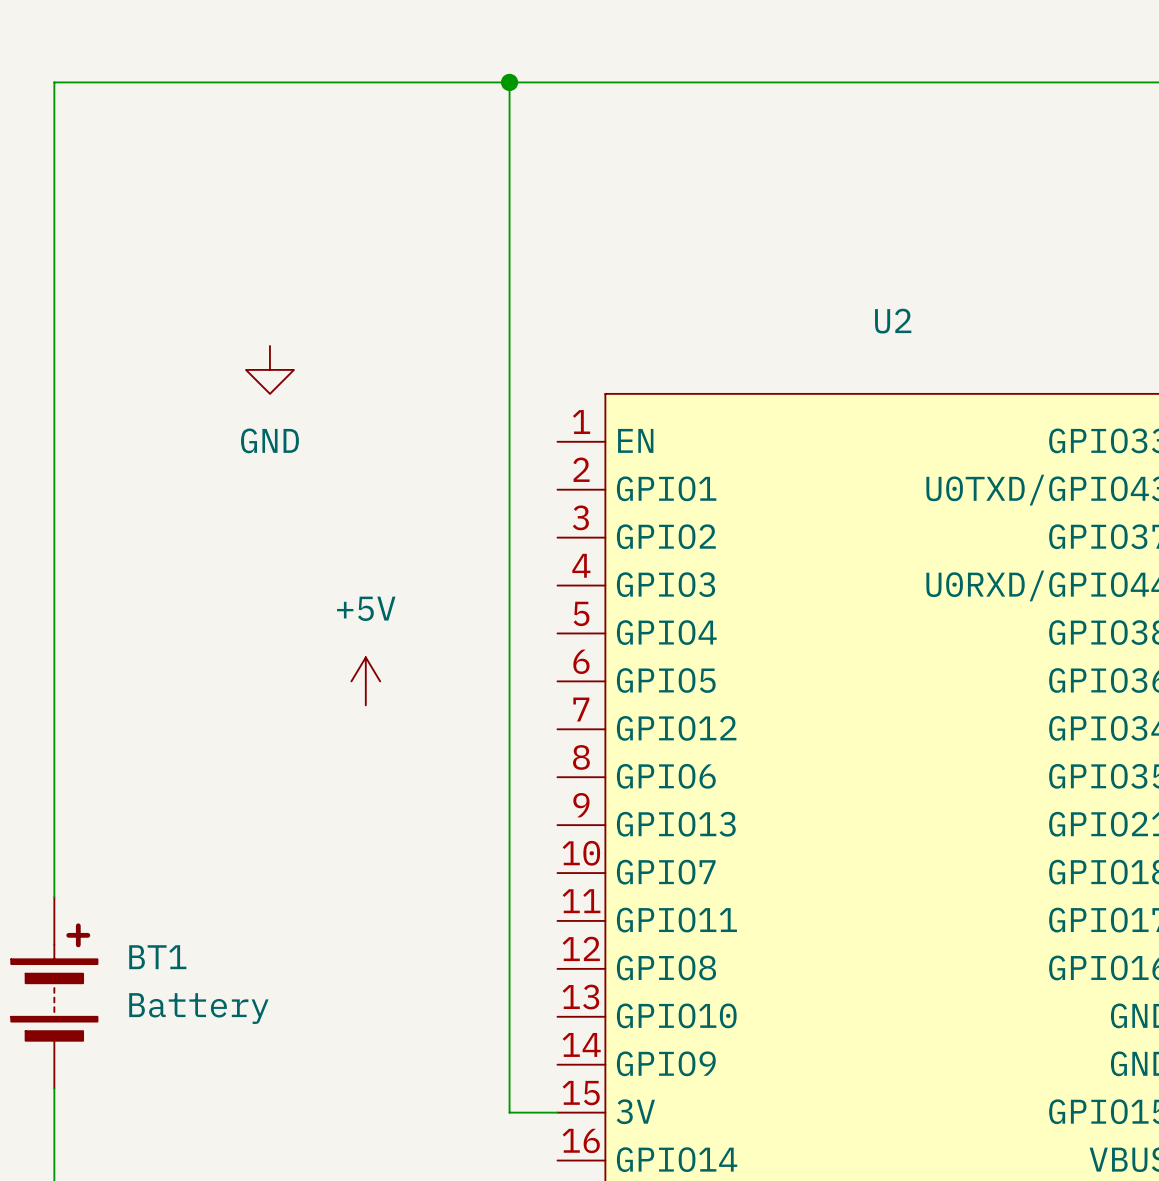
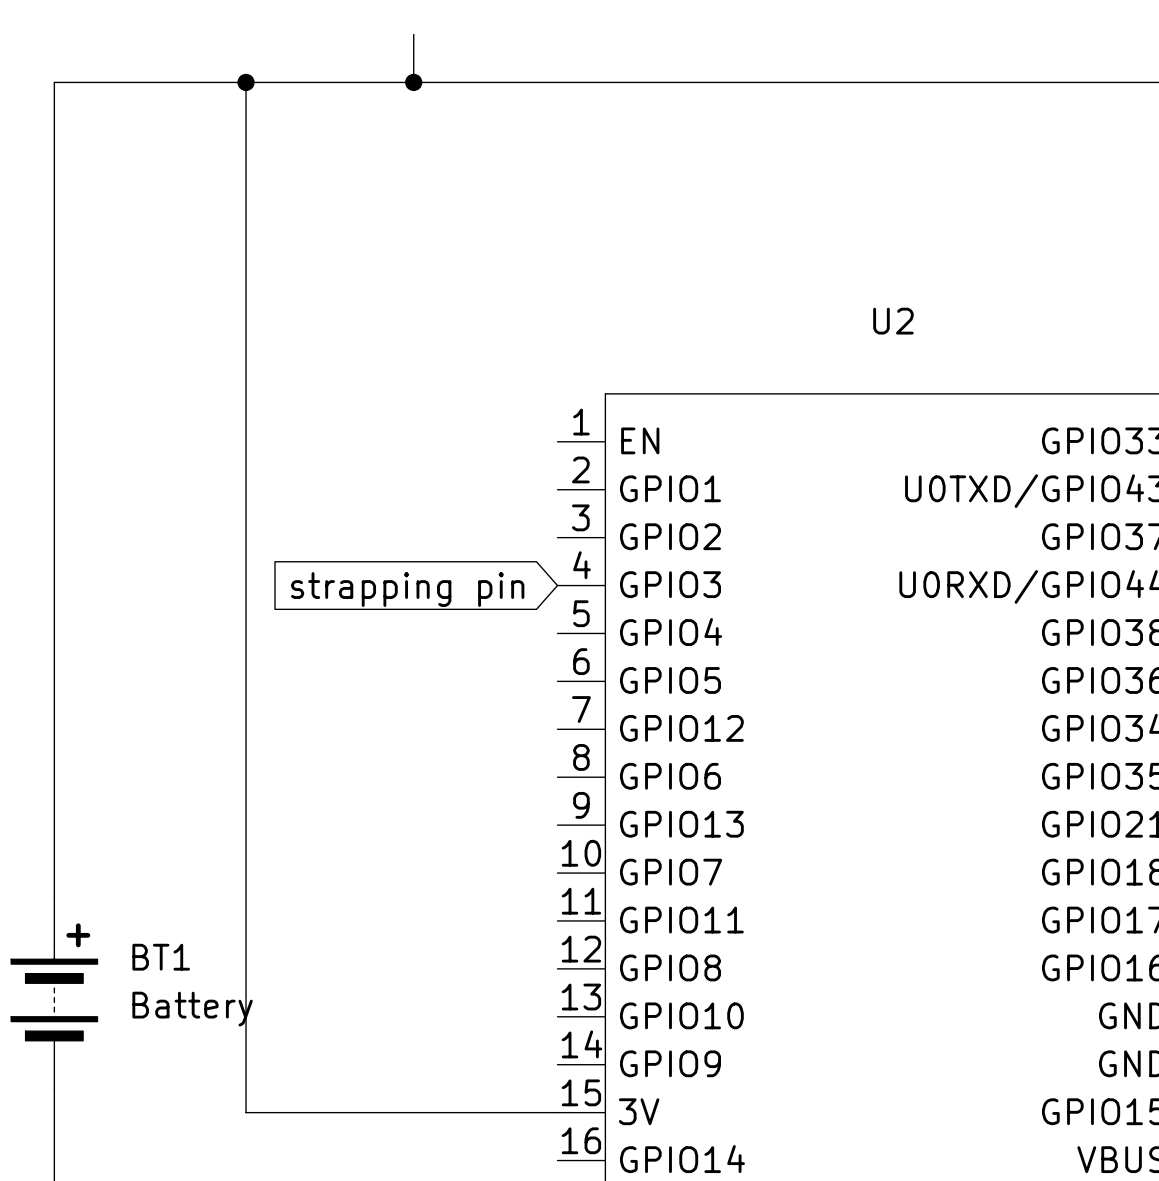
wire: none -> (413, 34) (413, 82)
junction: none -> (246, 82)
wire: (509, 82) (509, 1112) -> (246, 82) (246, 1112) (509, 1112)
junction position: (509, 82) -> (413, 82)
power symbol: GND (269, 369) -> none
global label: none -> strapping pin (407, 589)
power symbol: +5V (365, 681) -> none

